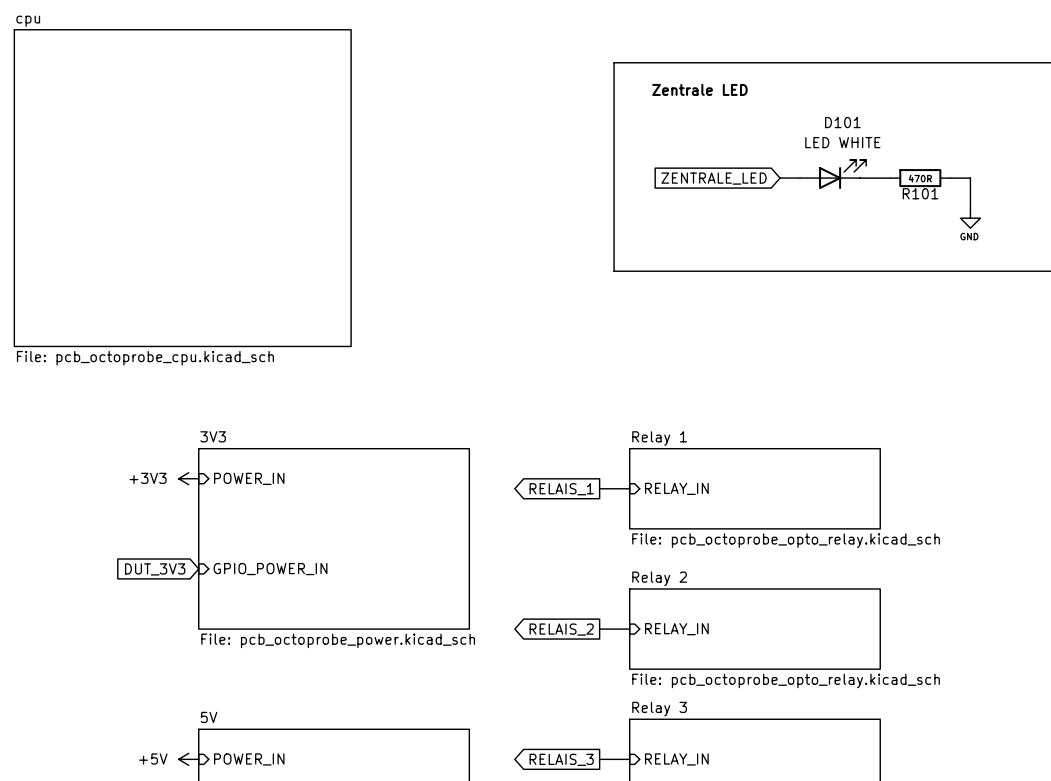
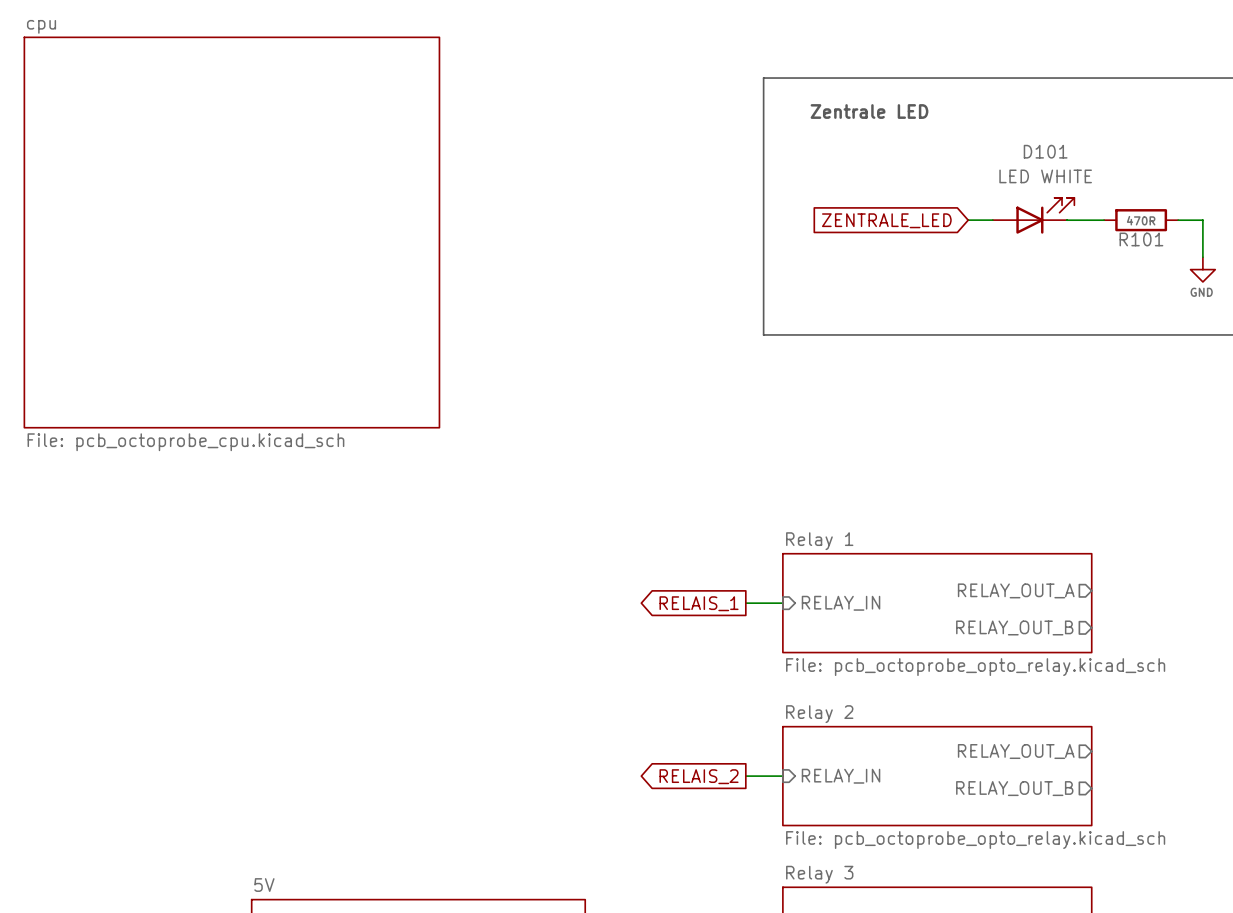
power symbol: +3V3 (188, 478) -> none
sheet pin: POWER_IN (249, 478) -> none
sheet pin: none -> RELAY_OUT_A (1016, 590)
sheet pin: none -> RELAY_OUT_B (1014, 627)
sheet 3V3: File: pcb_octoprobe_power.kicad_sch (334, 538) -> none
global label: DUT_3V3 (155, 569) -> none
sheet pin: GPIO_POWER_IN (270, 569) -> none
sheet pin: none -> RELAY_OUT_A (1016, 751)
sheet pin: none -> RELAY_OUT_B (1014, 788)

